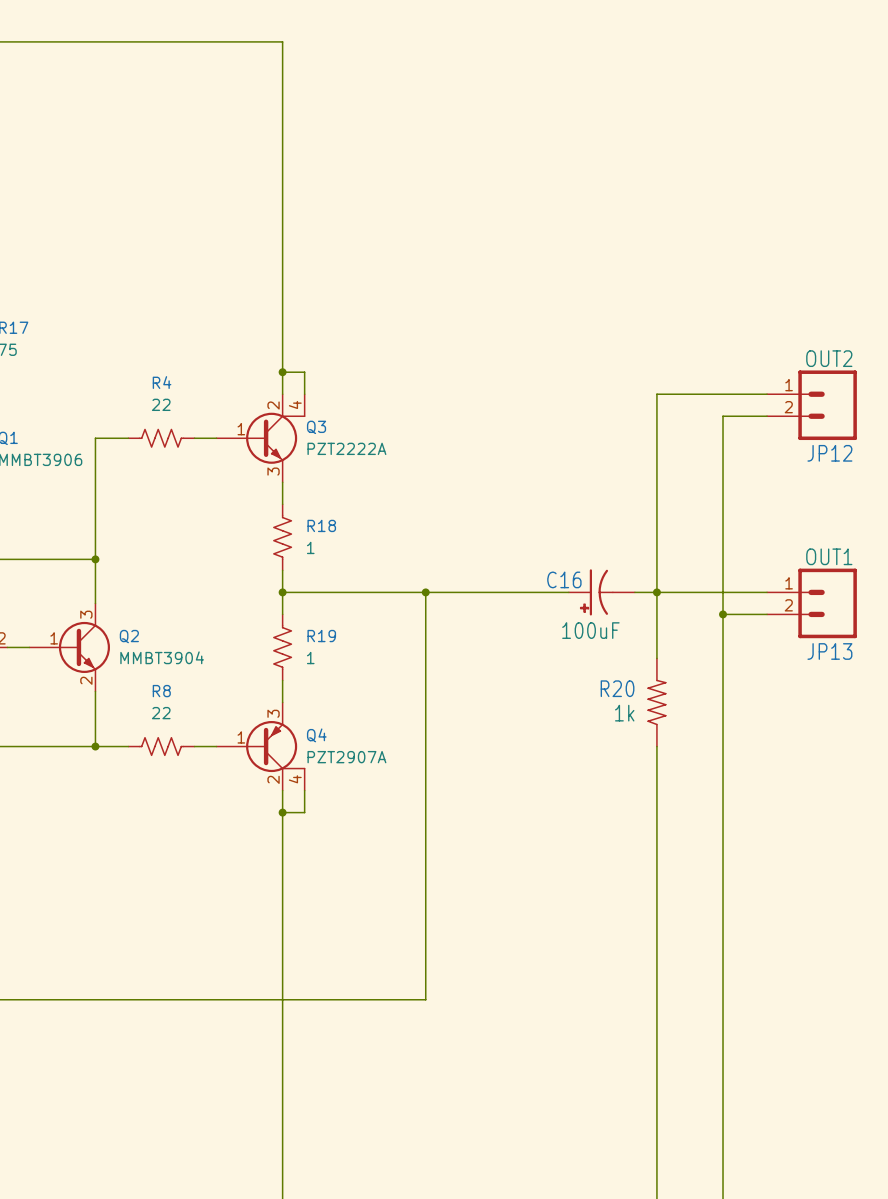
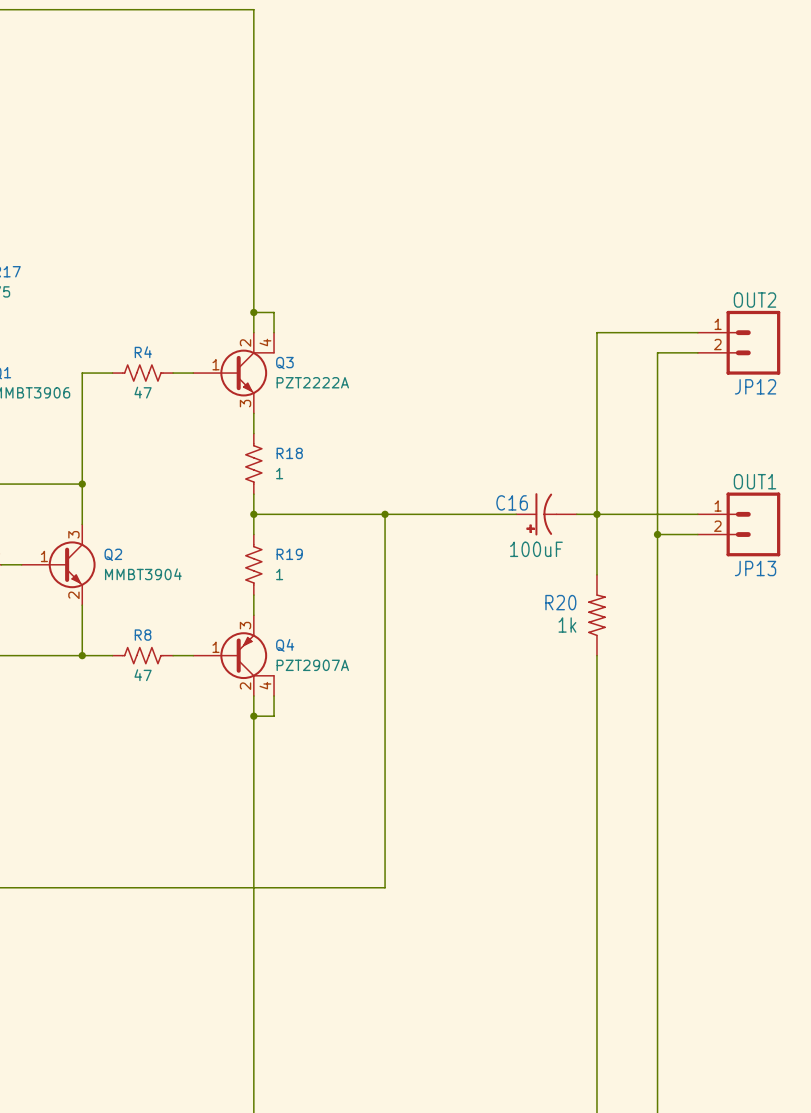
R4 name position: R4 (162, 382) -> R4 (143, 352)
R4 value: 22 (161, 404) -> 47 (143, 392)
R8 name position: R8 (161, 691) -> R8 (143, 635)
R8 value: 22 (161, 713) -> 47 (143, 675)

